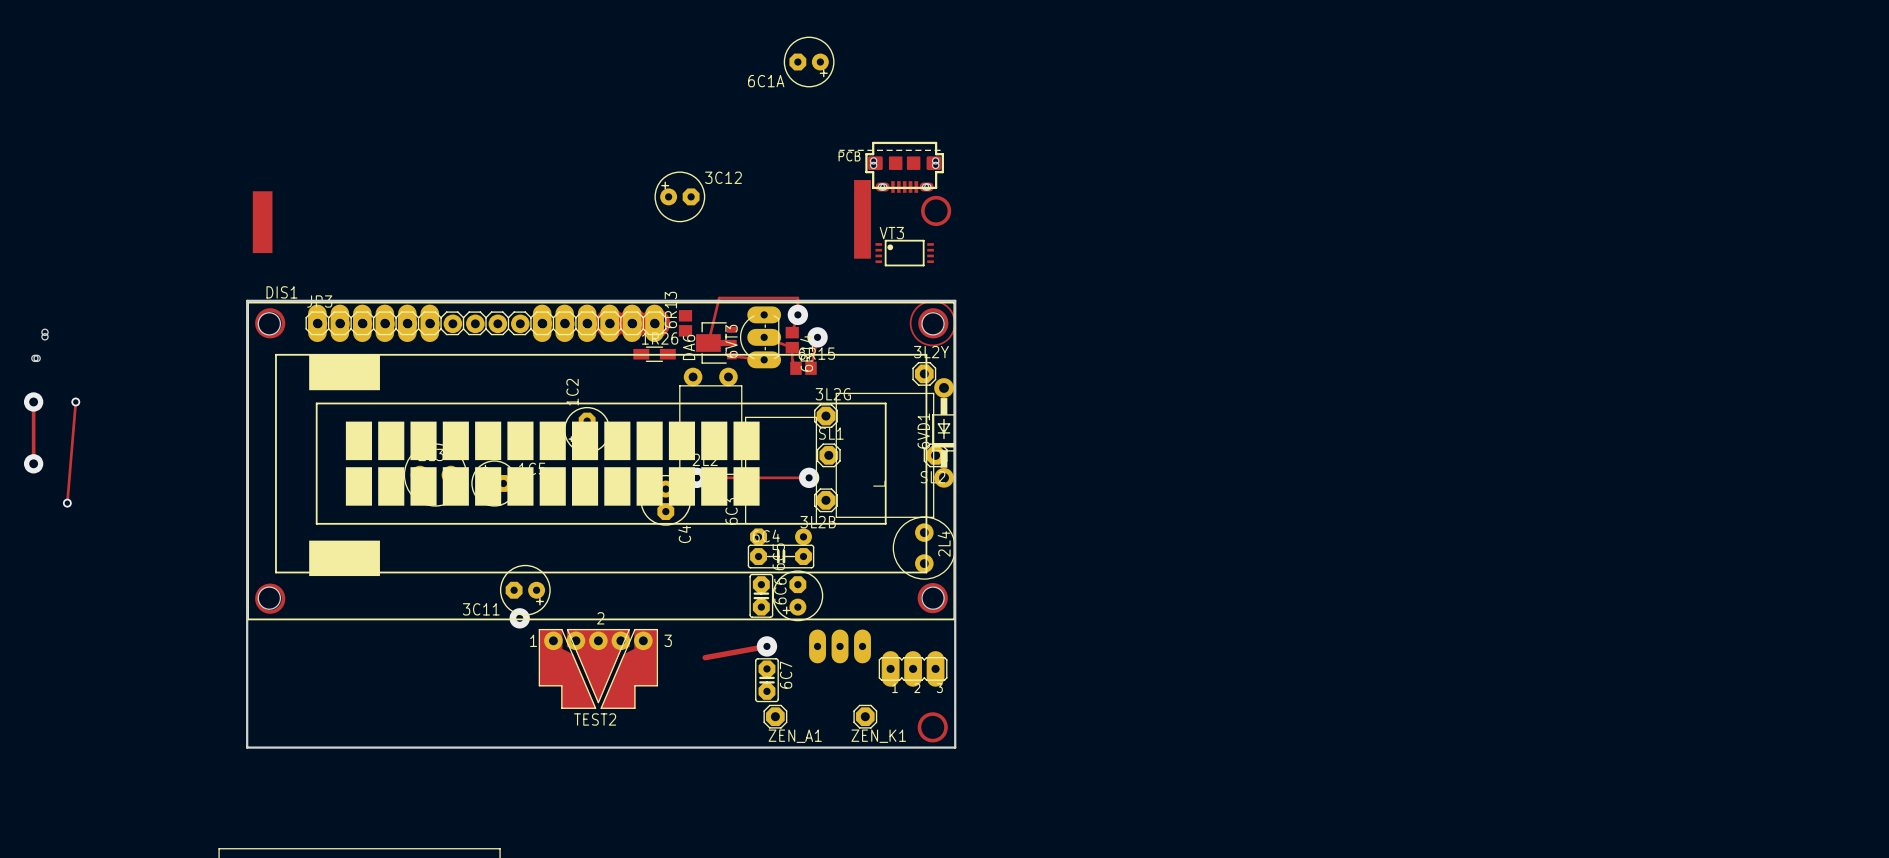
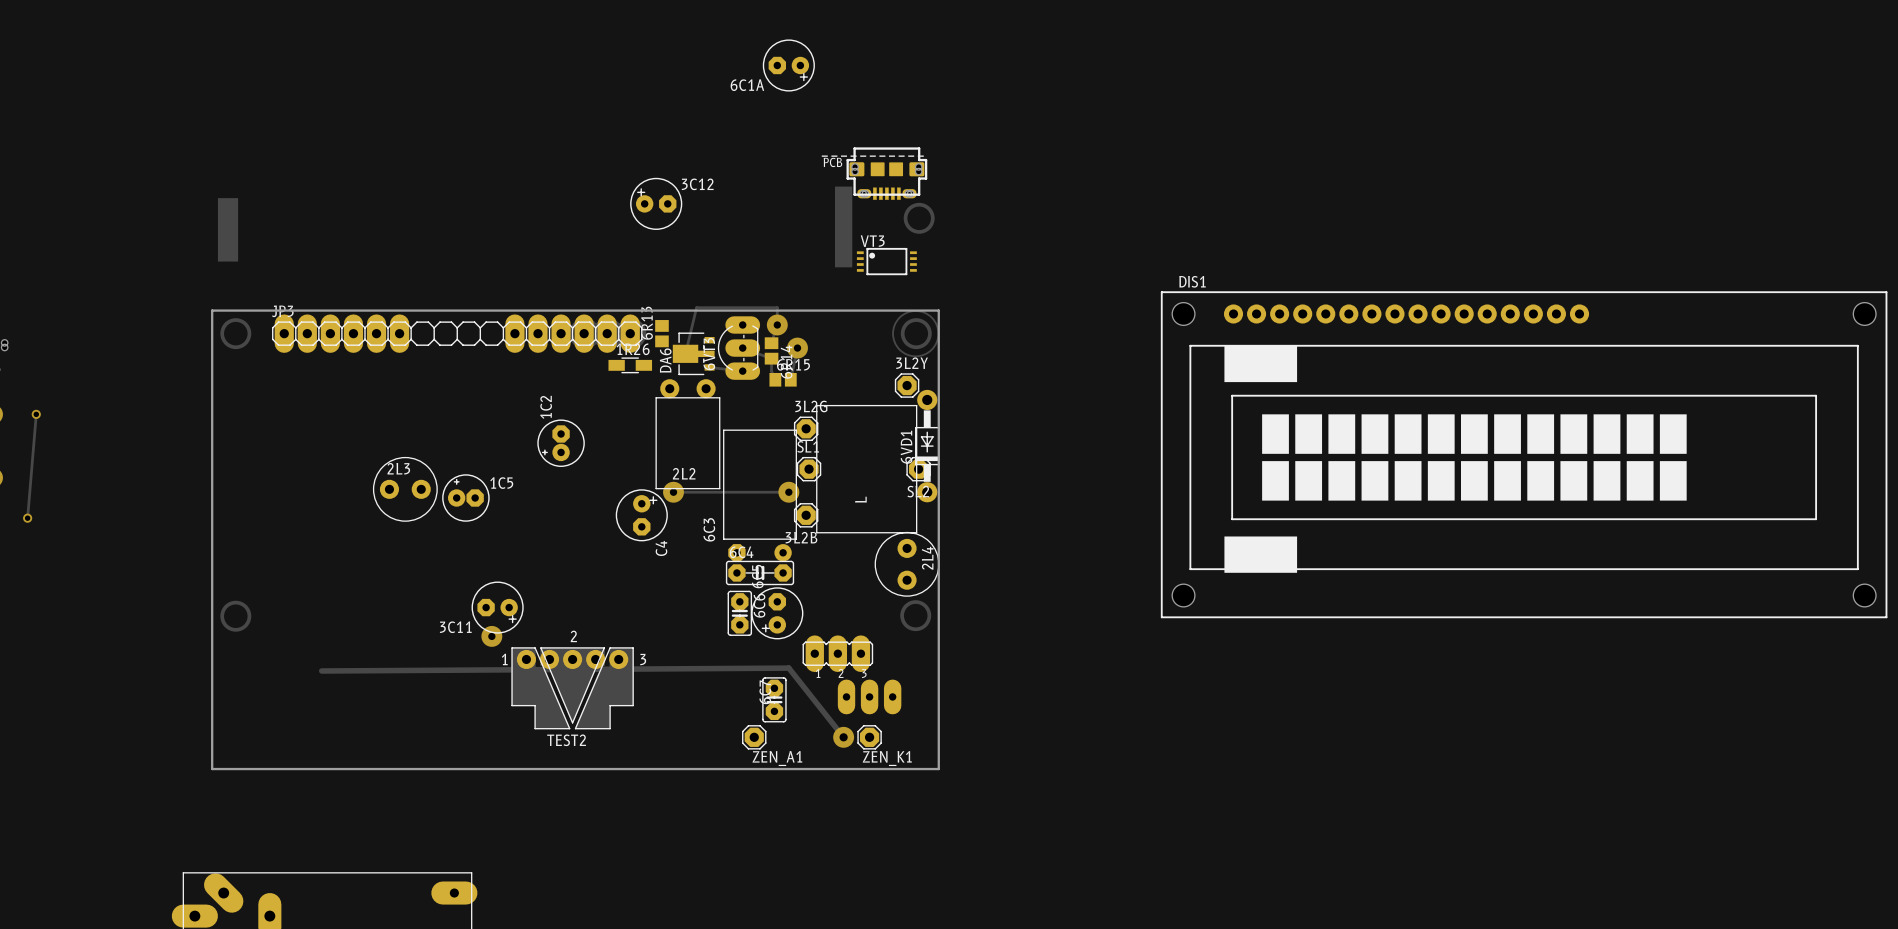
DIS1 position: (601, 460) -> (1524, 454)
track: (766, 646) (705, 657) -> none
via: (766, 646) -> none
part position: (840, 646) -> (869, 696)
track: none -> (321, 671) (788, 668) (843, 737)
part position: (913, 668) -> (837, 653)
6C7 position: (766, 680) -> (774, 699)
drawing: [917, 712, 948, 743] -> none
via: none -> (843, 737)
ZEN_K1 position: (865, 716) -> (869, 737)

